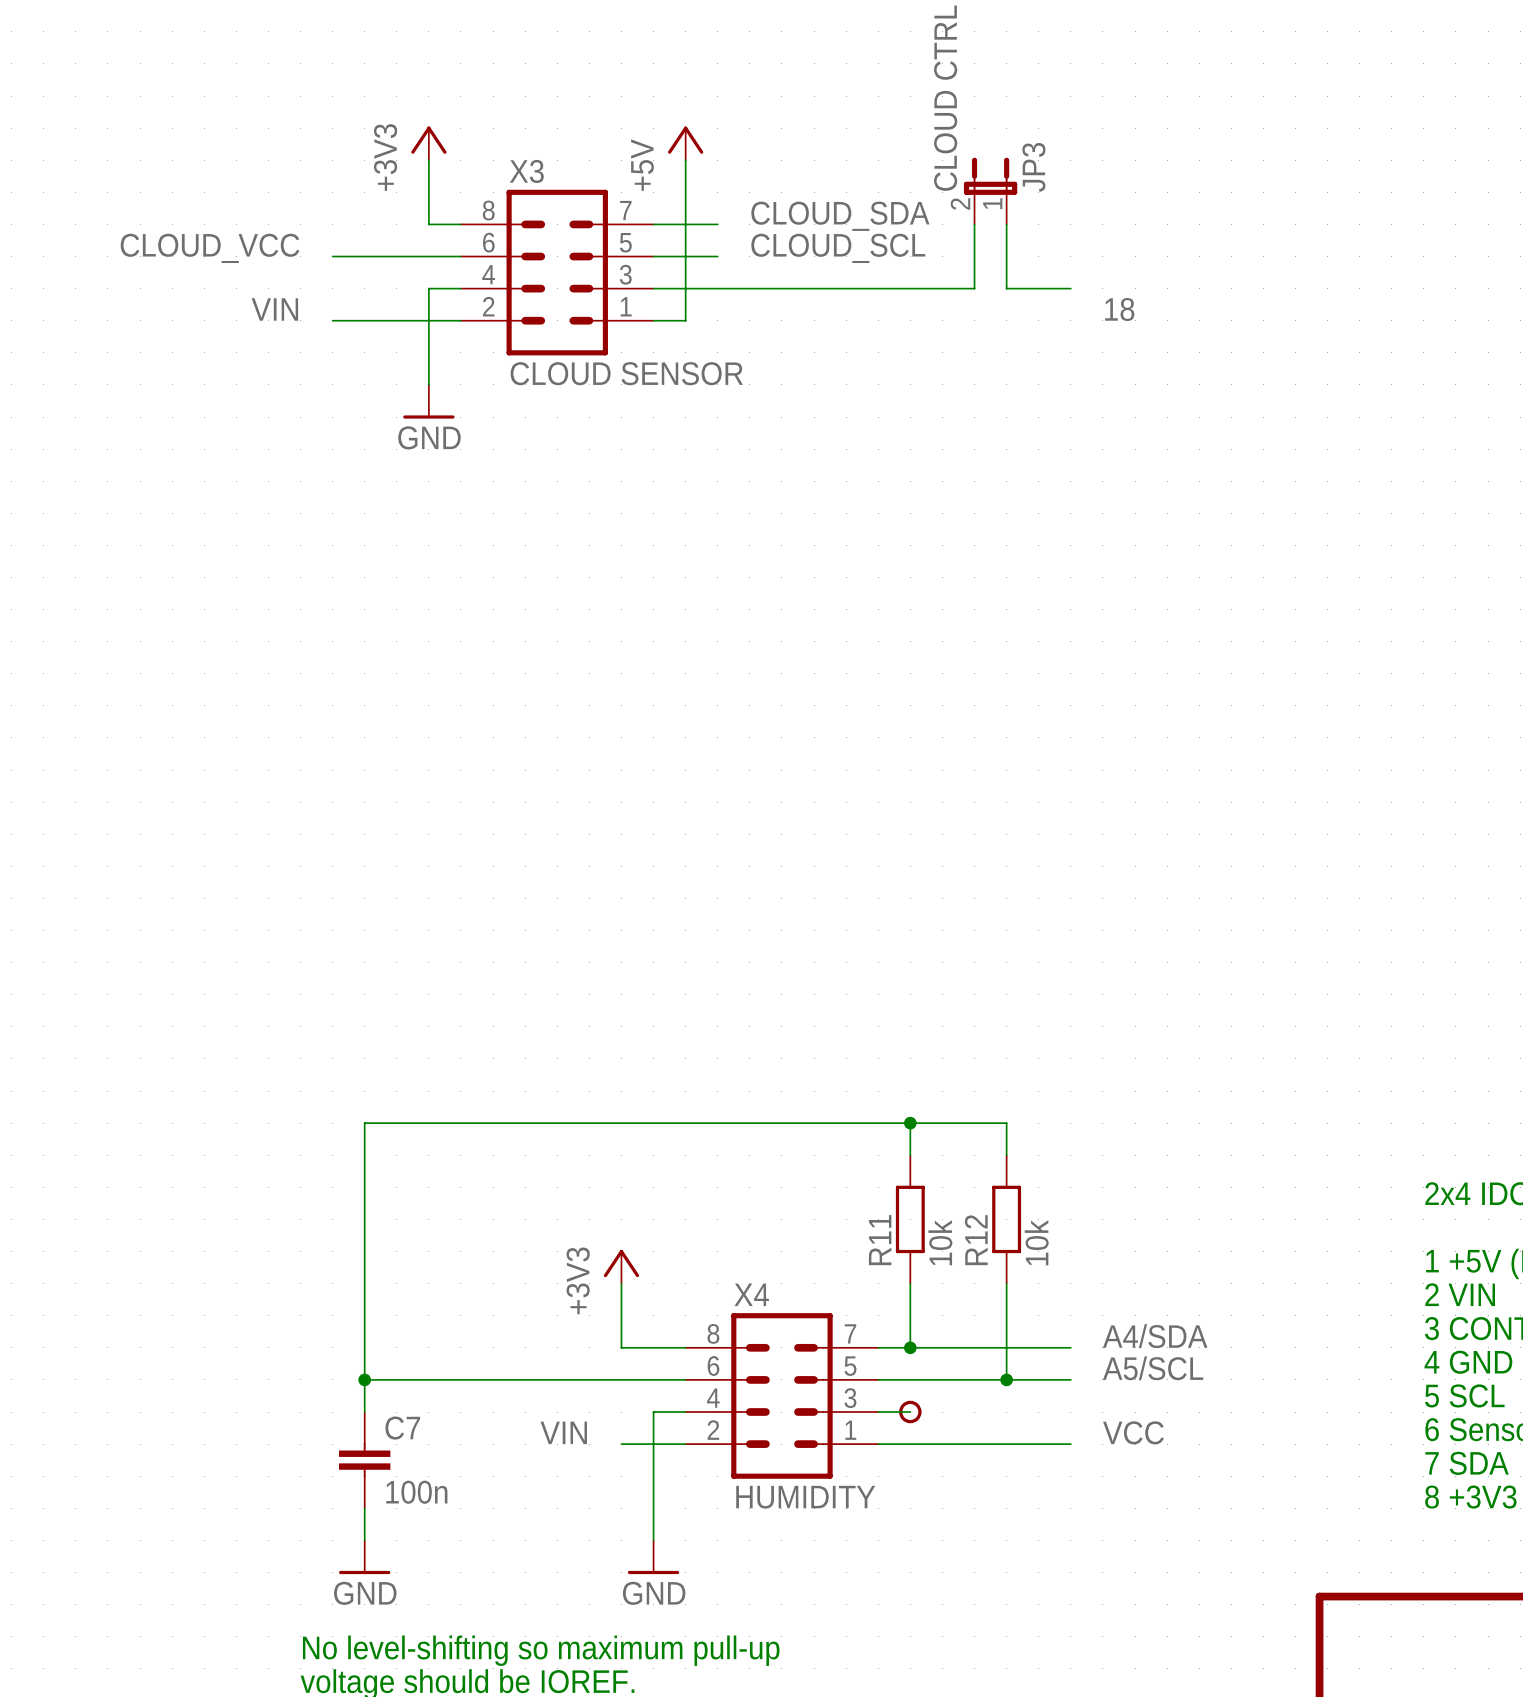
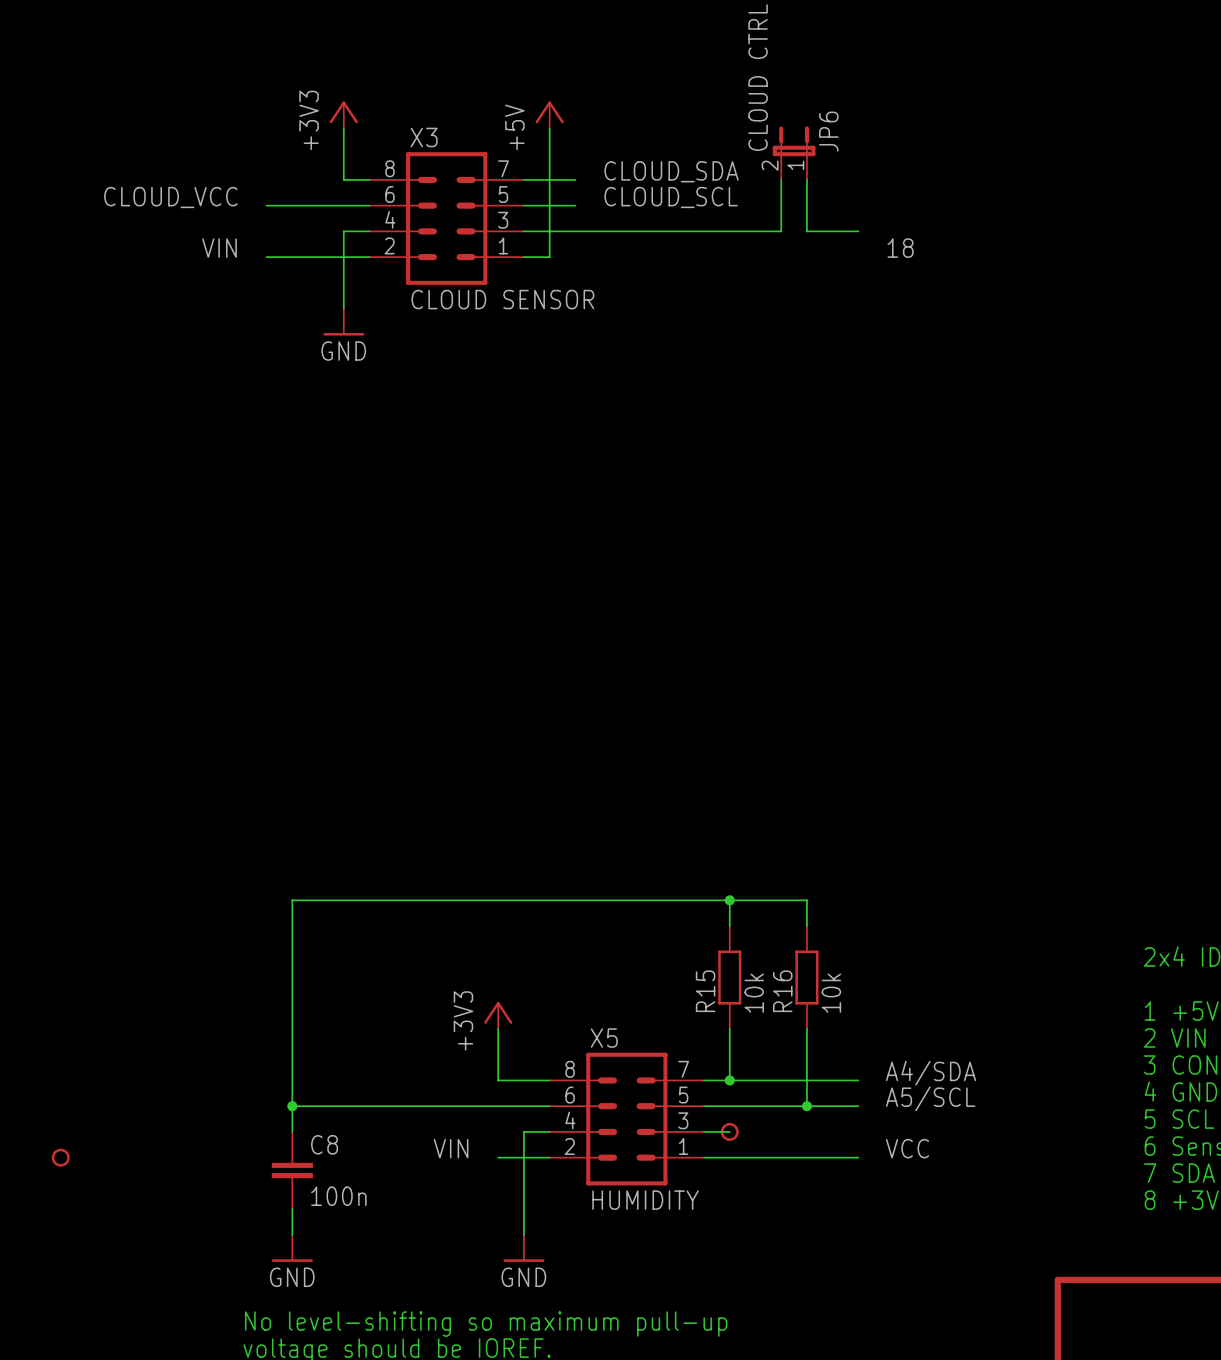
JP3 name: JP3 (1033, 167) -> JP6 (828, 131)
R11 name: R11 (880, 1240) -> R15 (705, 991)
R12 name: R12 (976, 1240) -> R16 (782, 991)
X4 name: X4 (751, 1294) -> X5 (604, 1038)
C7 name: C7 (402, 1428) -> C8 (324, 1144)
part: none -> (60, 1157)

